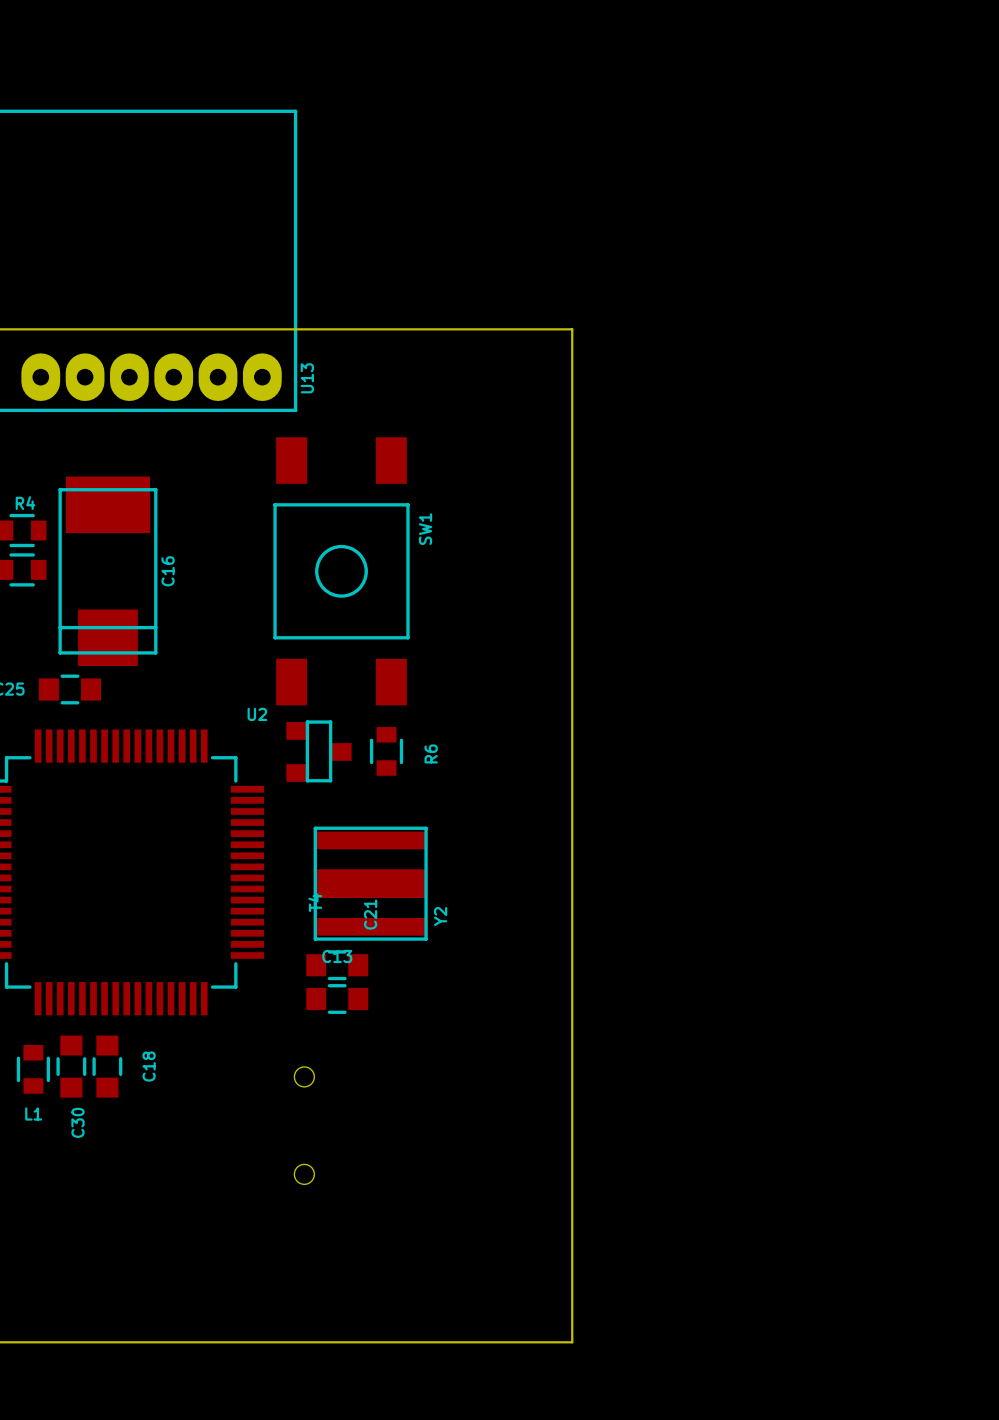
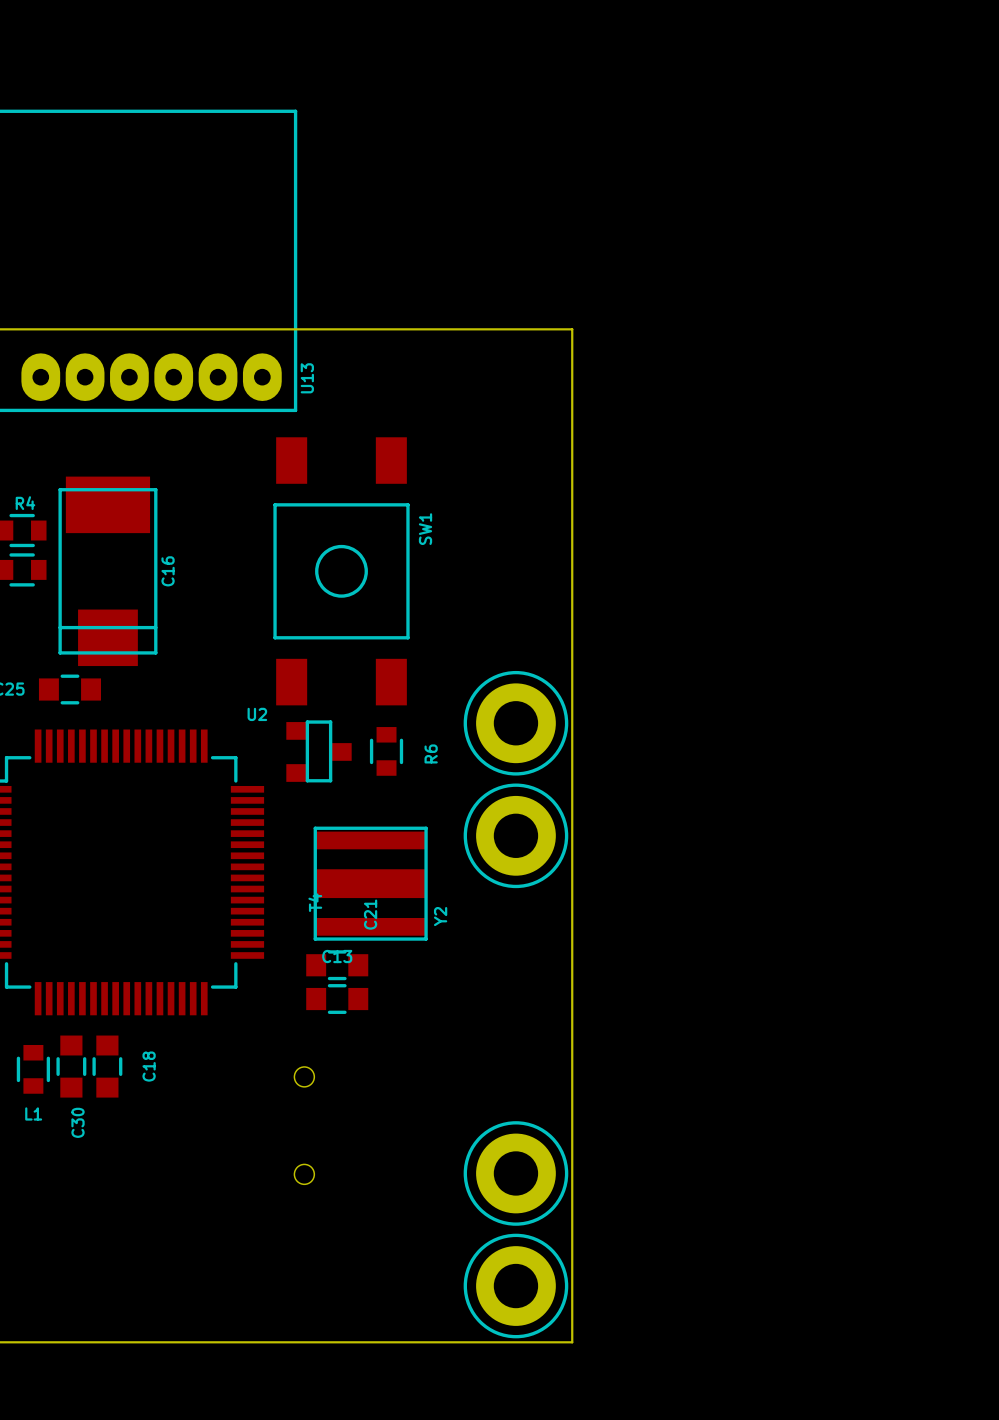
part: none -> (515, 723)
part: none -> (515, 835)
part: none -> (515, 1173)
part: none -> (515, 1286)

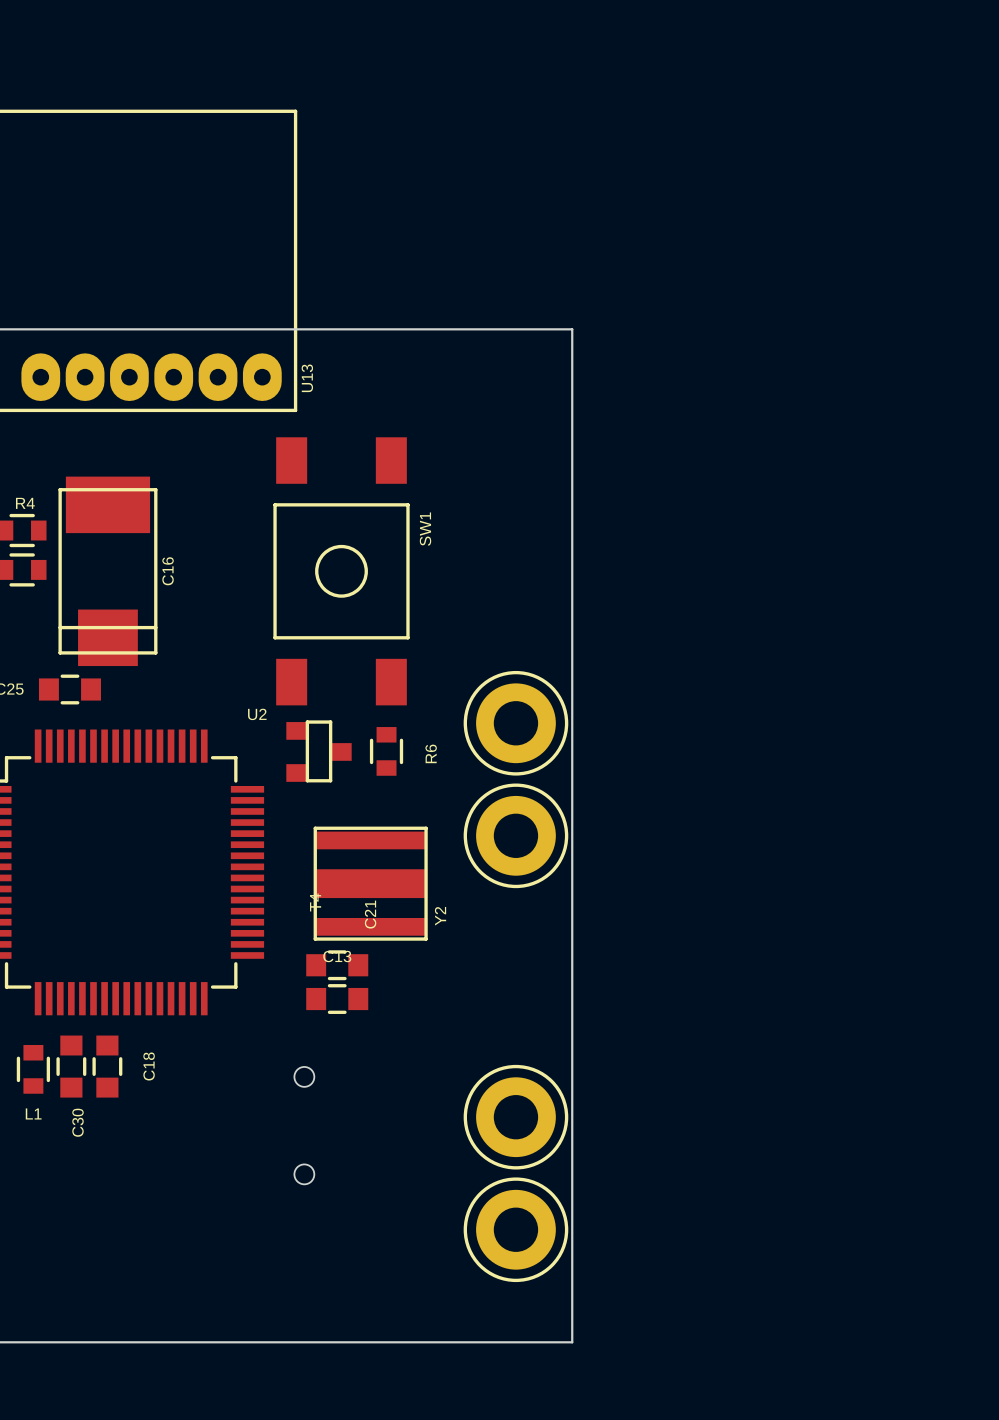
part: none -> (515, 1117)
part: (515, 1173) -> none
part: none -> (515, 1229)
part: (515, 1286) -> none

